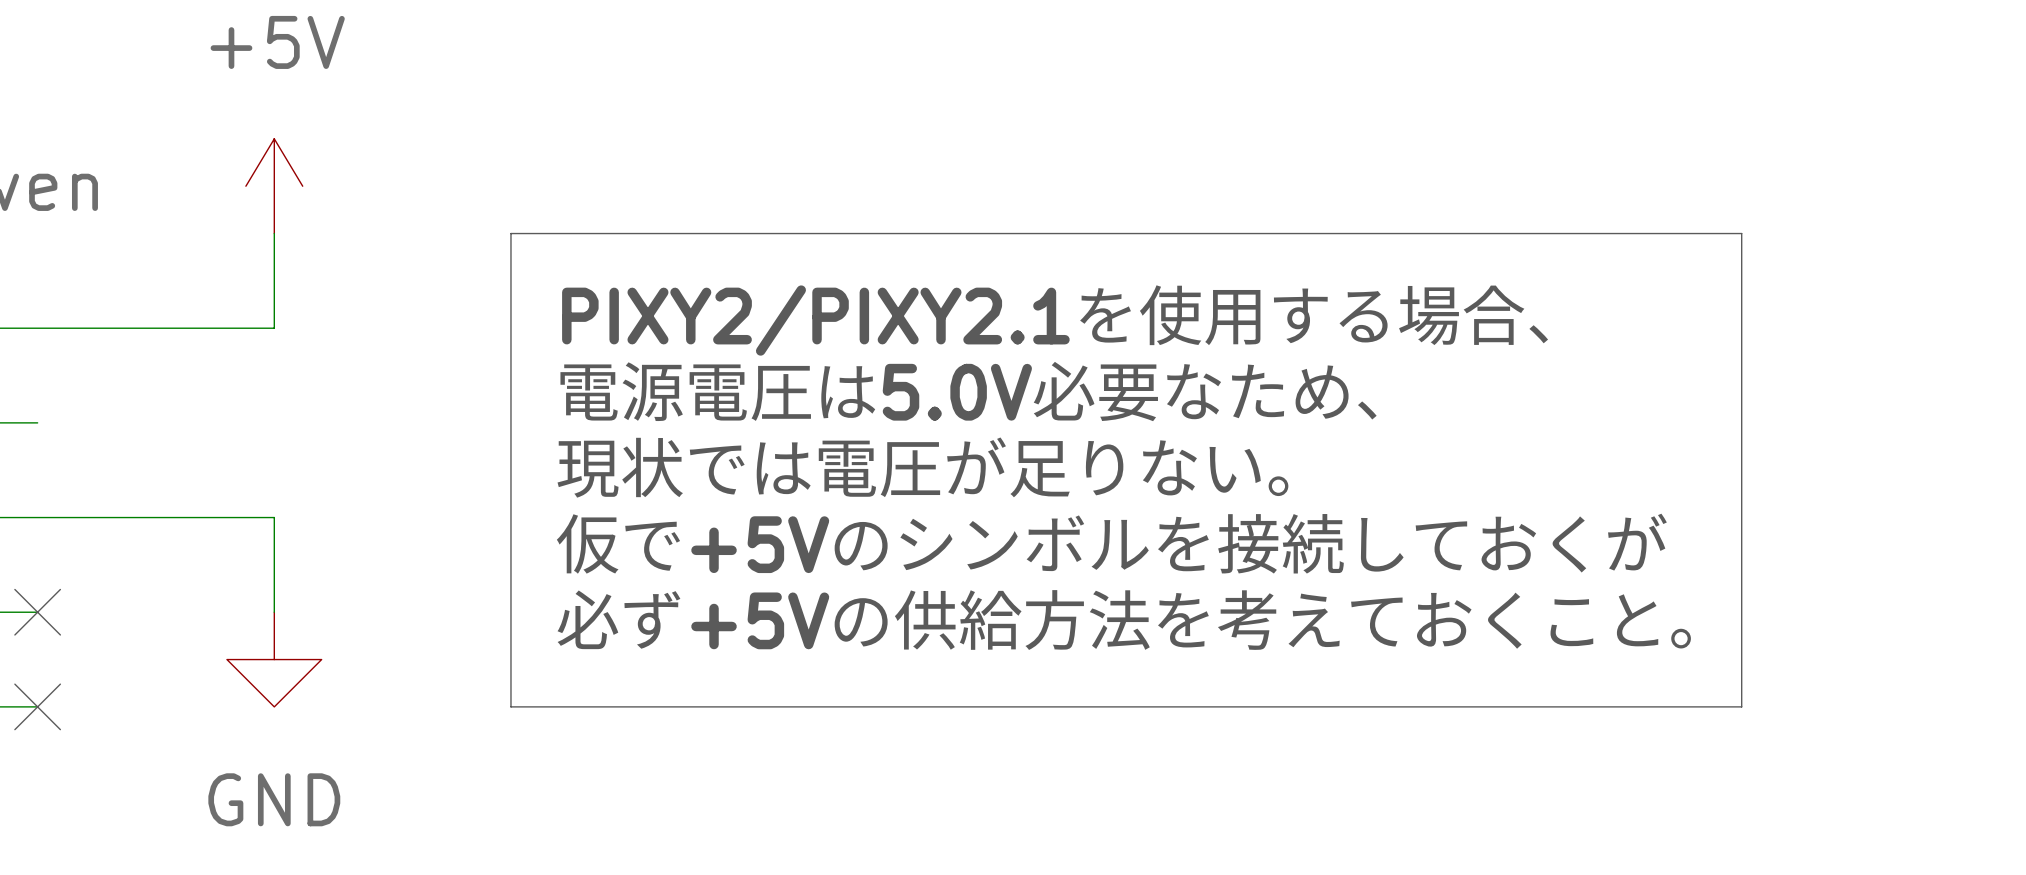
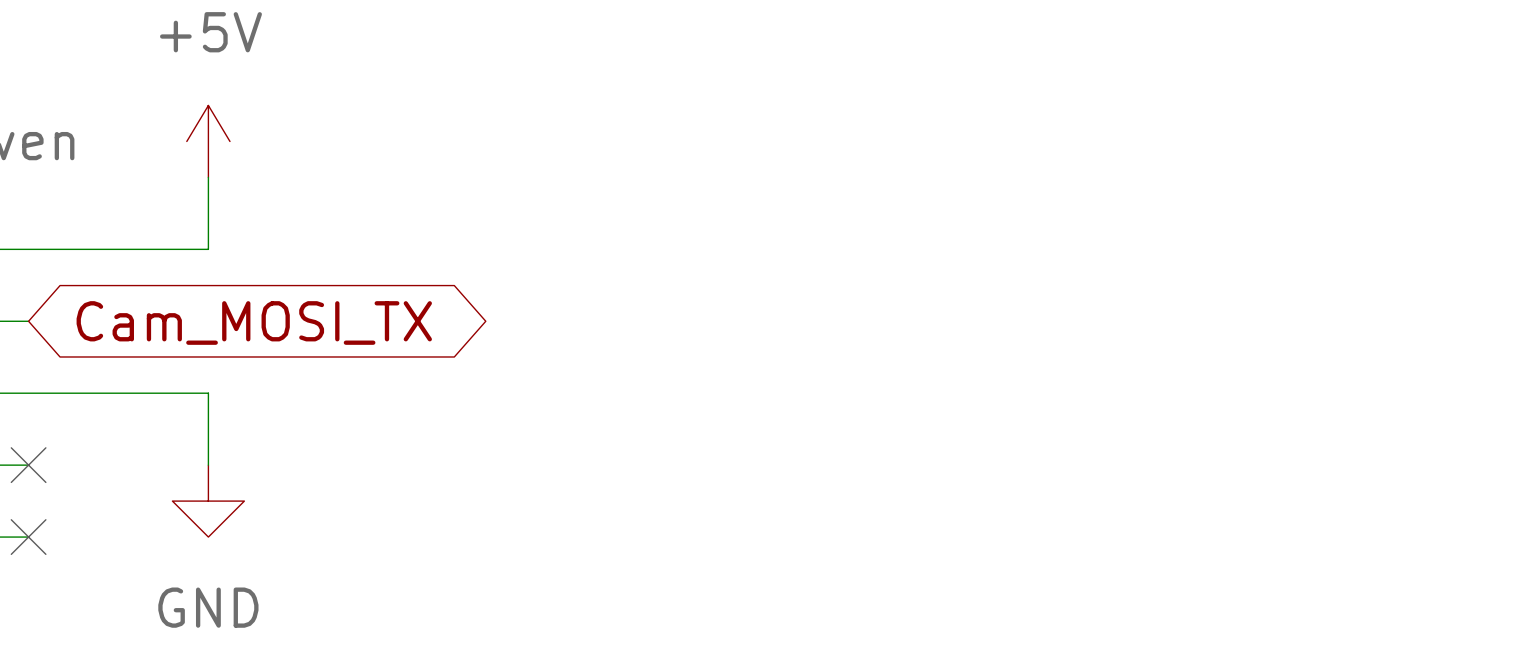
line: (510, 233) (1741, 233) (1741, 706) (510, 706) (510, 233) -> none
text: PIXY2/PIXY2.1を使用する場合、 (1057, 318) -> none
text: 電源電圧は5.0V必要なため、 (968, 391) -> none
global label: none -> Cam_MOSI_TX (254, 322)
text: 現状では電圧が足りない。 (922, 467) -> none
text: 仮で+5Vのシンボルを接続しておくが (1111, 543) -> none
text: 必ず+5Vの供給方法を考えておくこと。 (1124, 620) -> none

